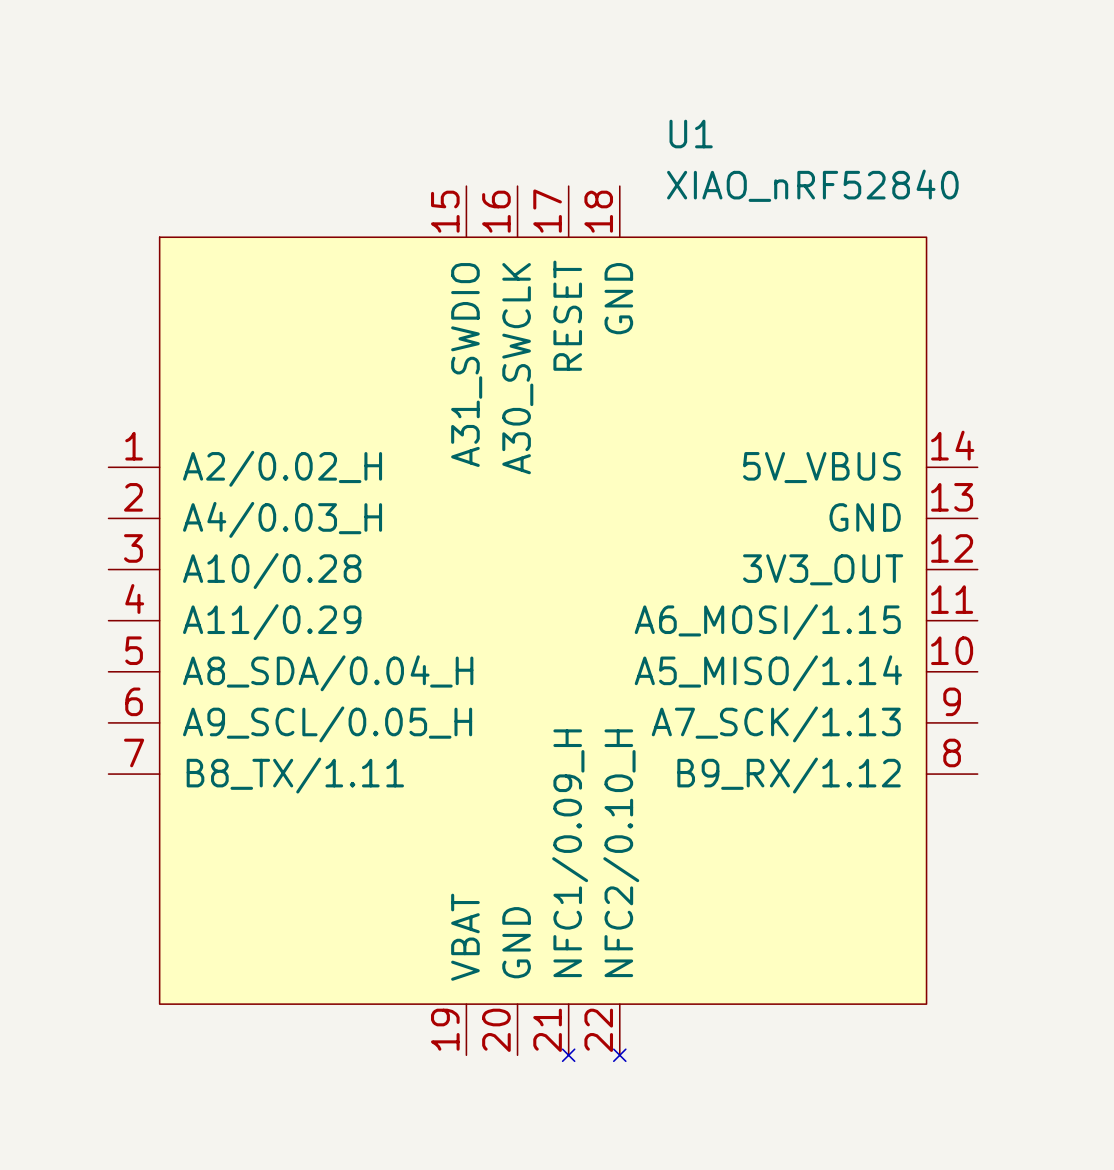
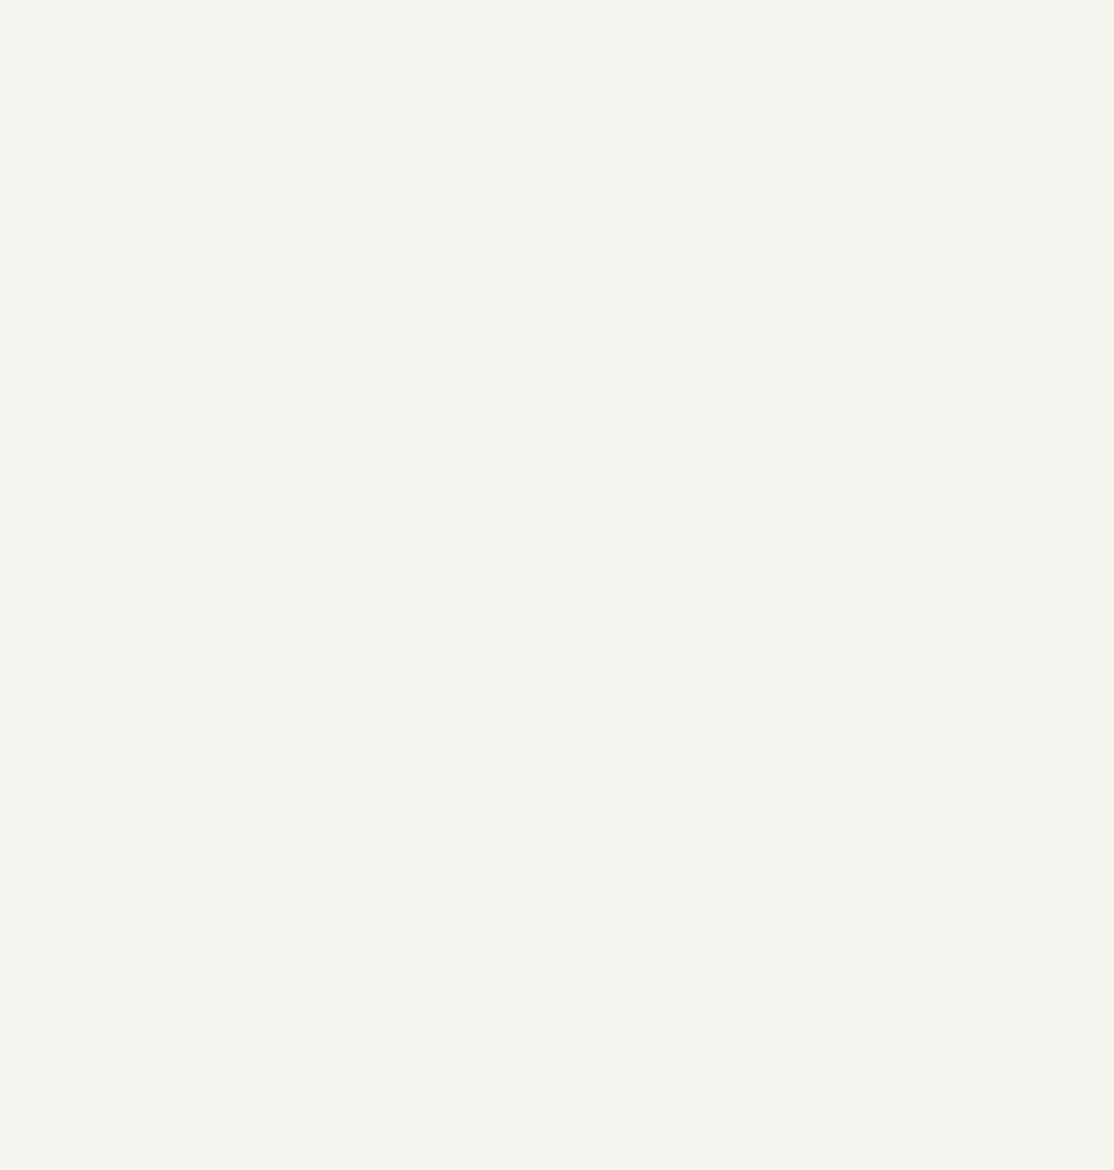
U1: XIAO_nRF52840 (543, 623) -> none

